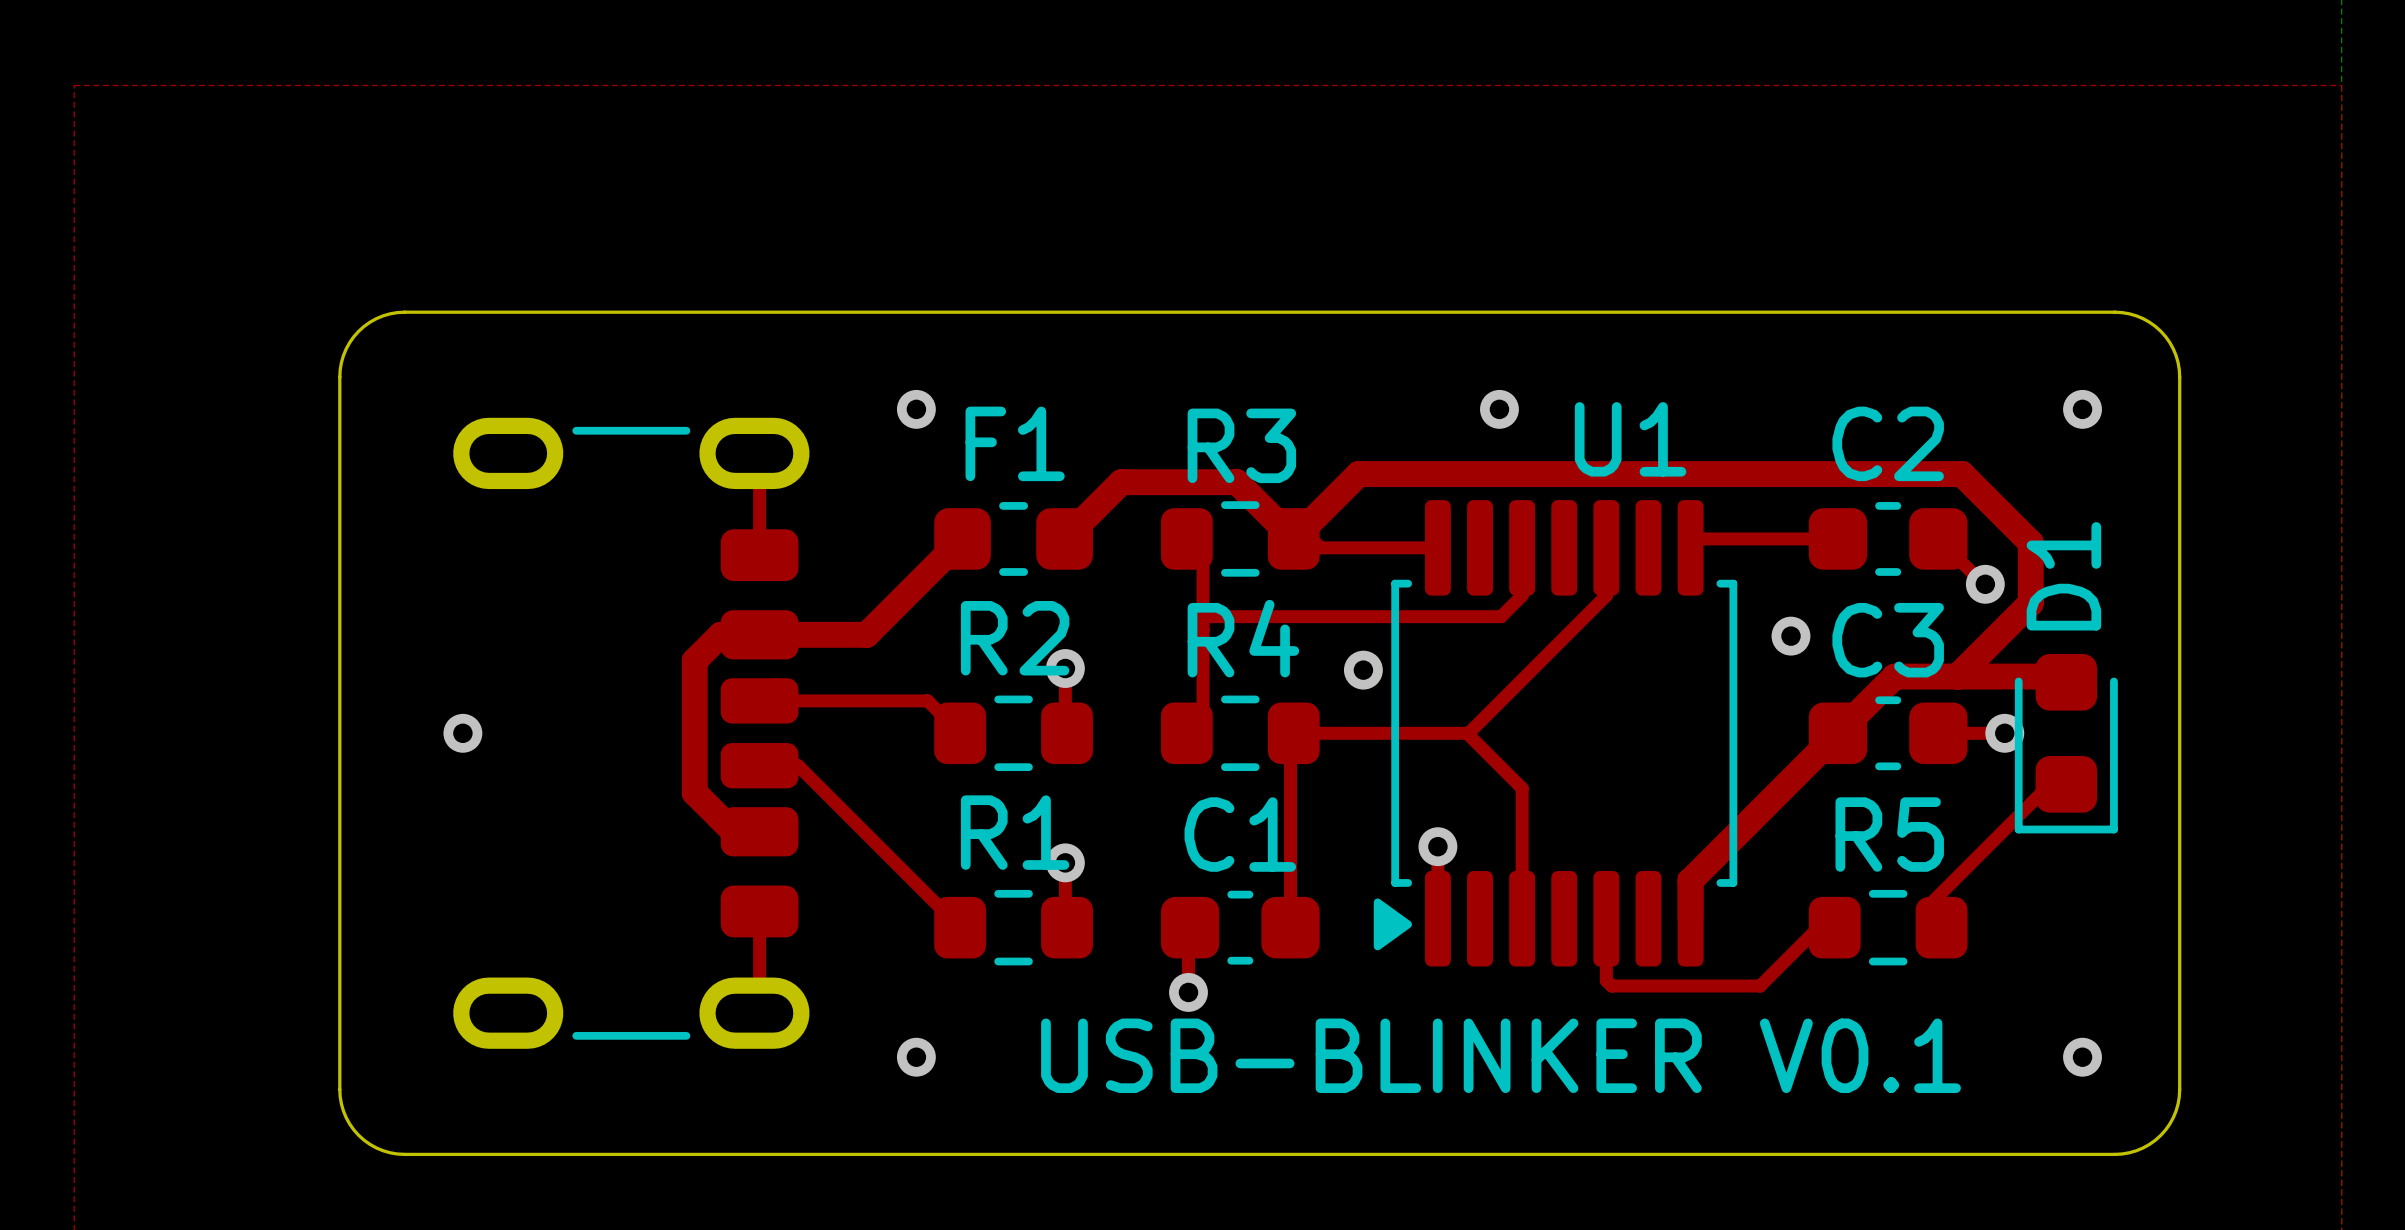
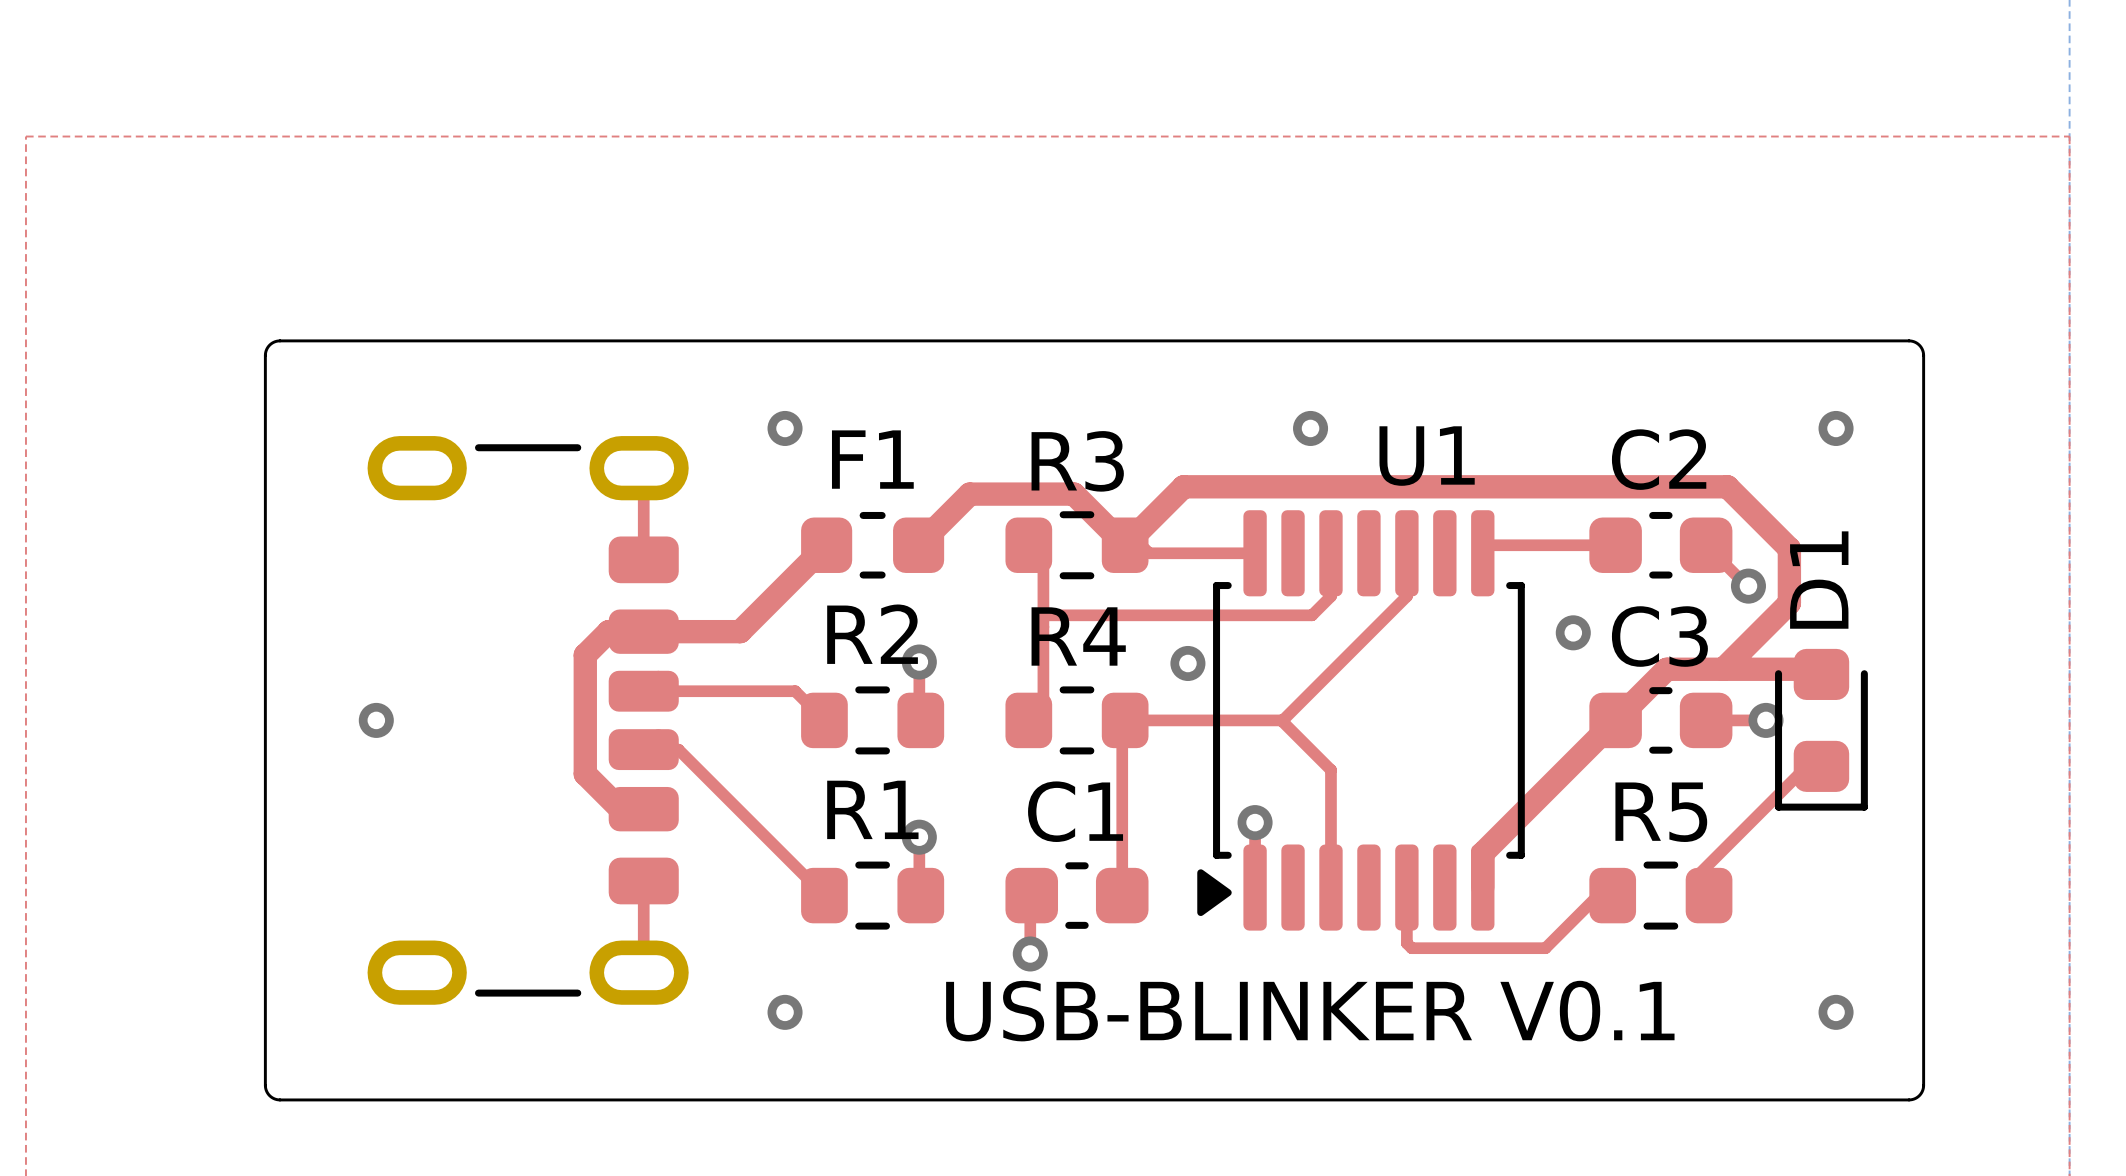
board edge: (404, 312) (390, 313) (376, 318) (358, 331) (349, 342) (343, 355) (339, 376) -> (323, 340) (278, 340) (269, 345) (265, 353) (265, 399)
board edge: (2114, 312) (2129, 313) (2143, 318) (2160, 331) (2169, 342) (2176, 355) (2179, 376) -> (1865, 340) (1910, 340) (1919, 345) (1923, 353) (1923, 399)
board edge: (339, 1089) (341, 1104) (346, 1117) (358, 1135) (376, 1147) (390, 1152) (404, 1154) -> (265, 1041) (265, 1086) (269, 1095) (278, 1099) (323, 1099)
board edge: (2179, 1089) (2176, 1111) (2169, 1124) (2160, 1135) (2143, 1147) (2129, 1152) (2114, 1154) -> (1923, 1041) (1923, 1086) (1919, 1095) (1910, 1099) (1865, 1099)

